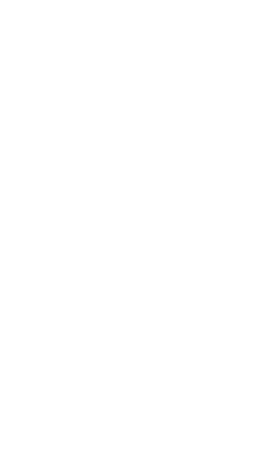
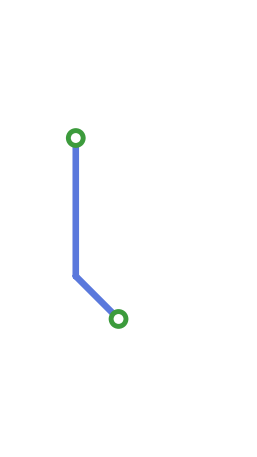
track: none -> (75, 138) (75, 276) (118, 318)
via: none -> (75, 138)
via: none -> (118, 318)

